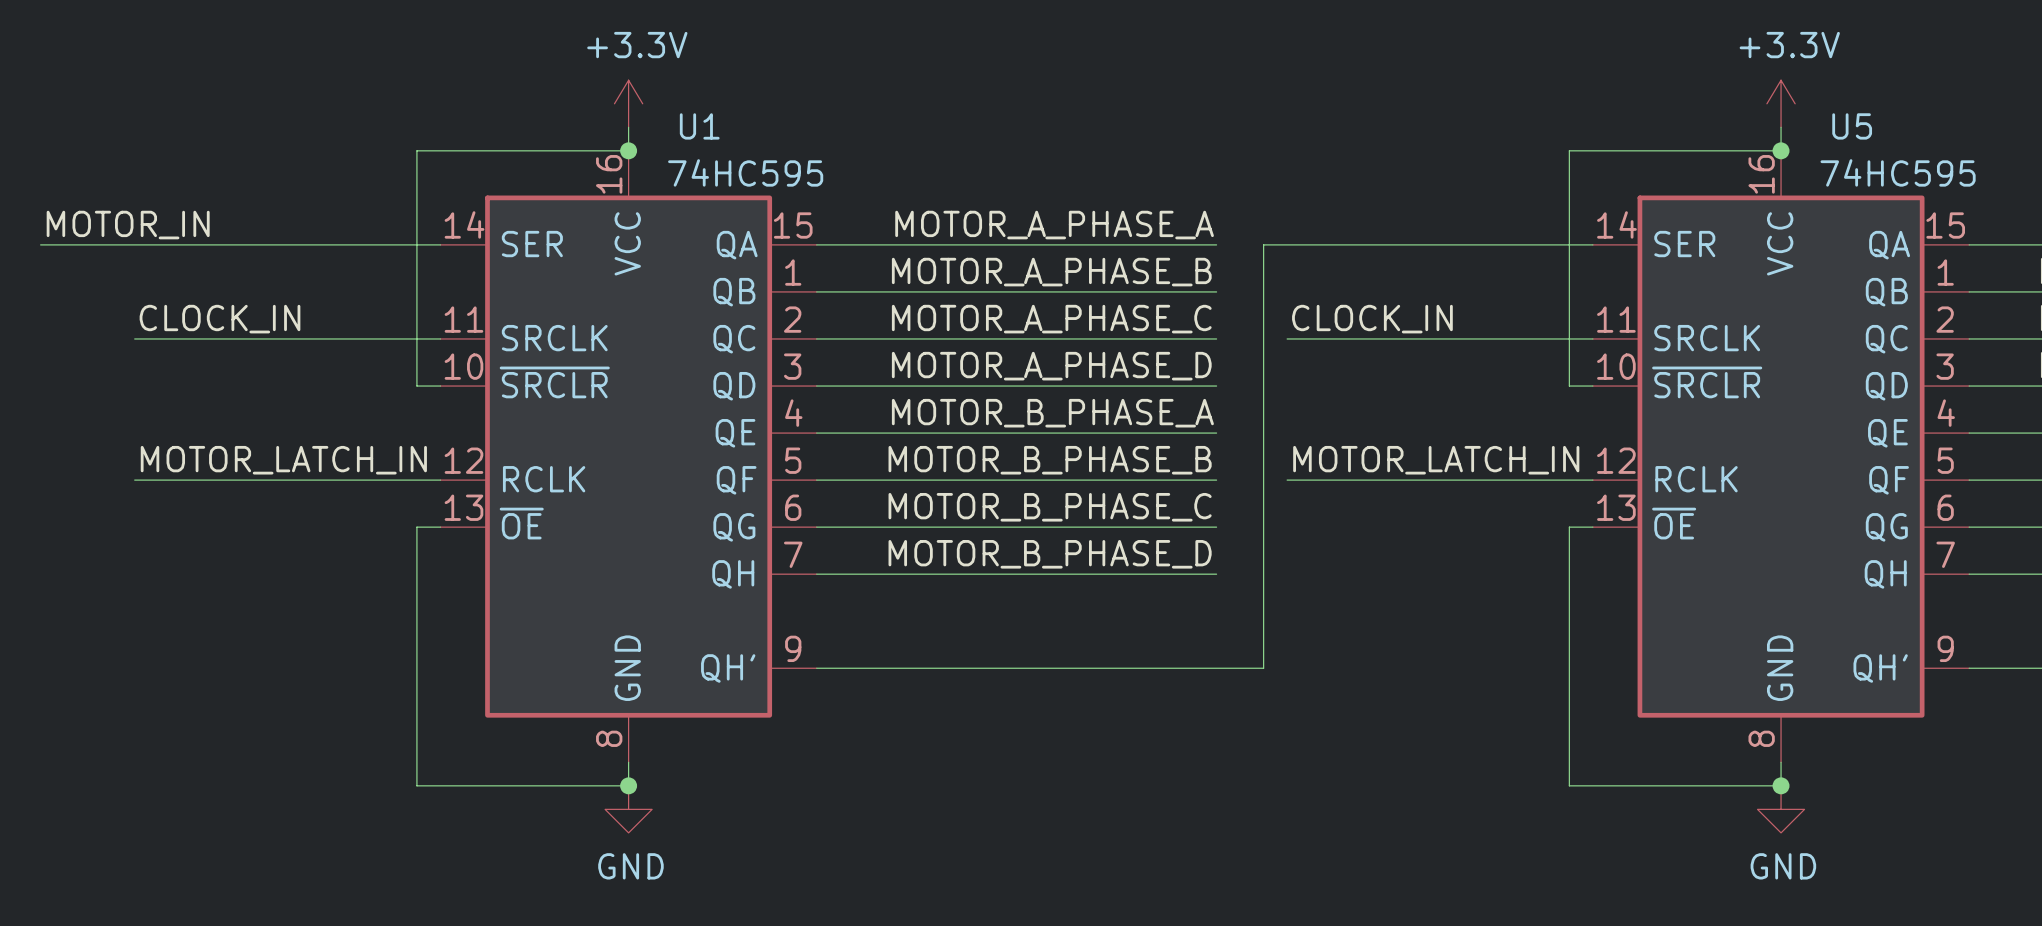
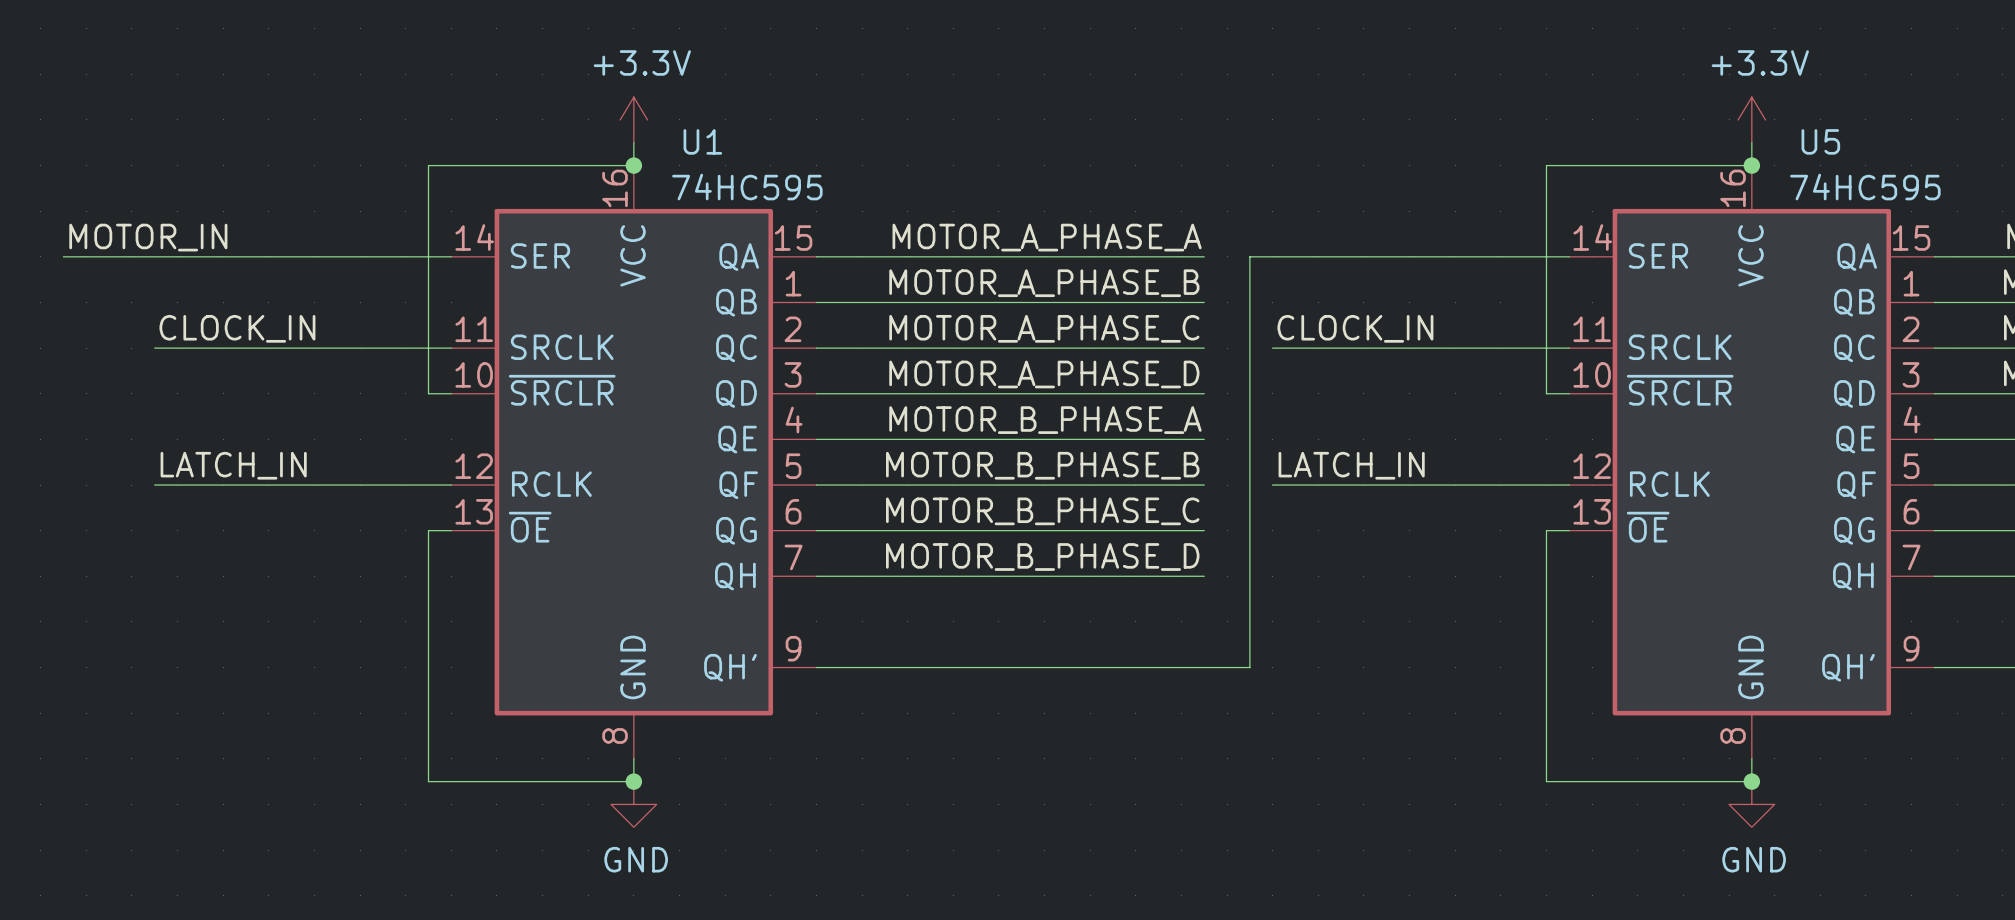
label: MOTOR_LATCH_IN (283, 460) -> LATCH_IN (233, 465)
label: MOTOR_LATCH_IN (1436, 460) -> LATCH_IN (1351, 465)

